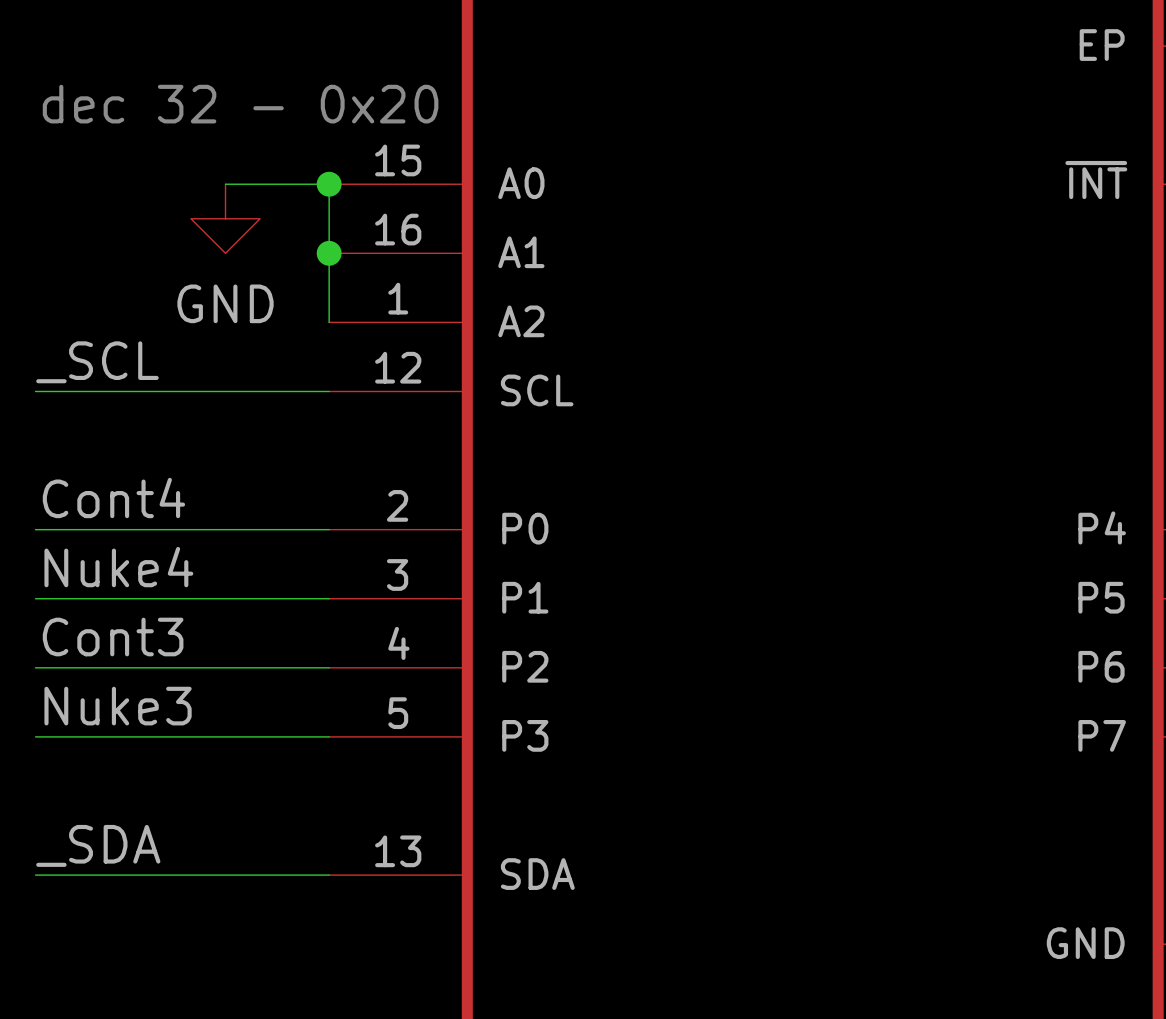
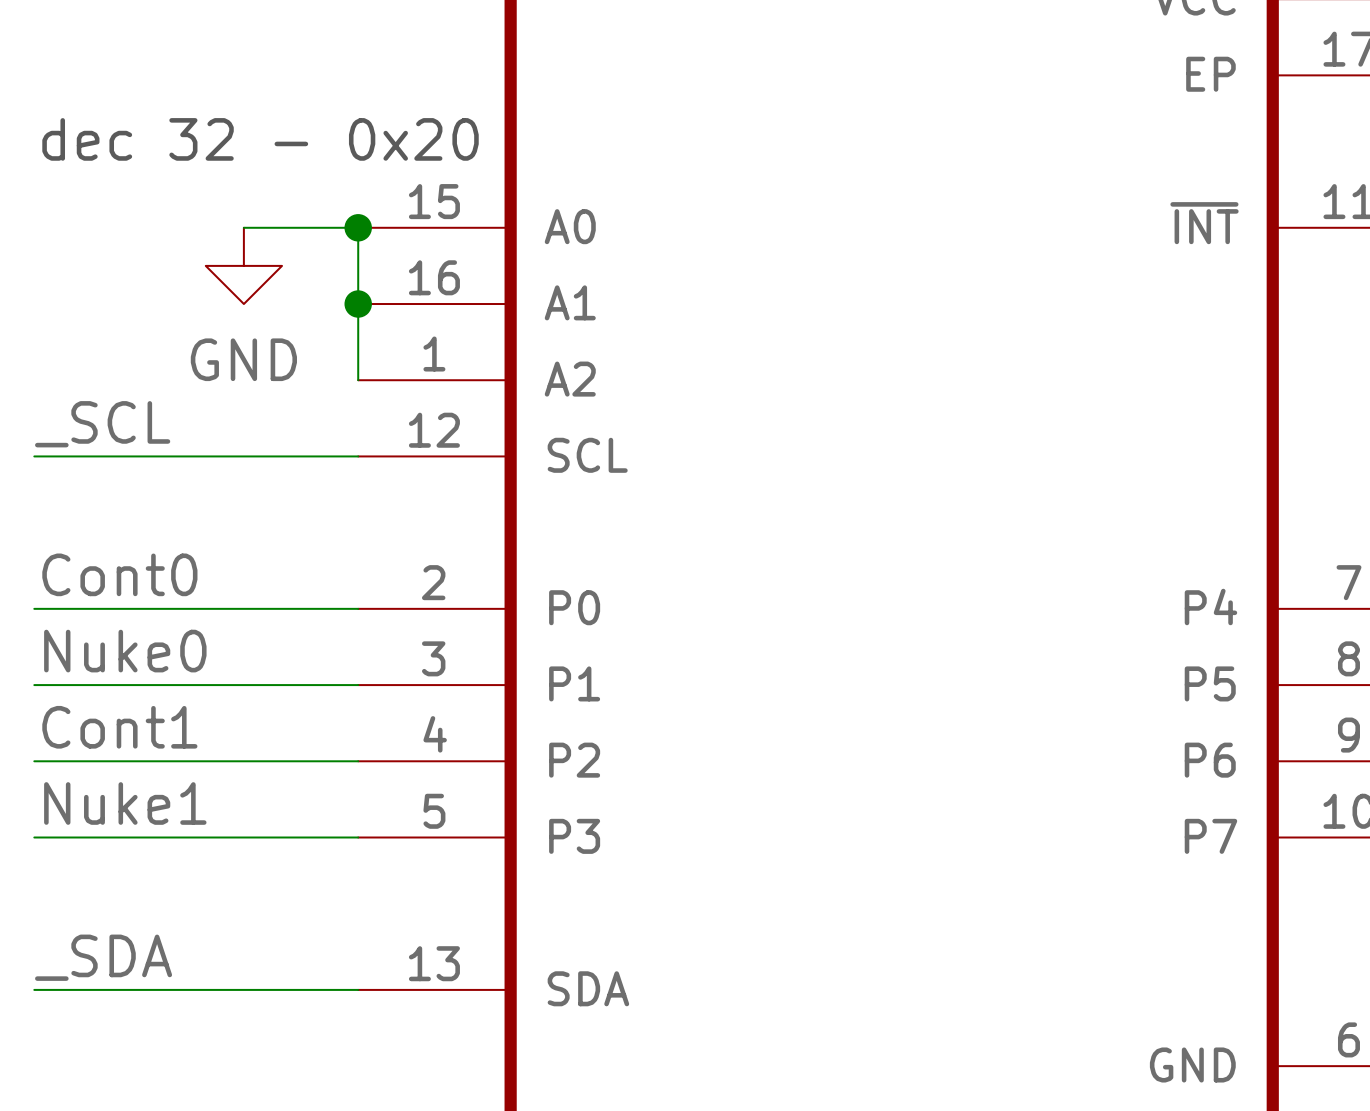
label: Cont4 (113, 498) -> Cont0 (119, 574)
label: Nuke4 (118, 567) -> Nuke0 (125, 651)
label: Cont3 (113, 637) -> Cont1 (119, 727)
label: Nuke3 (118, 706) -> Nuke1 (125, 803)

